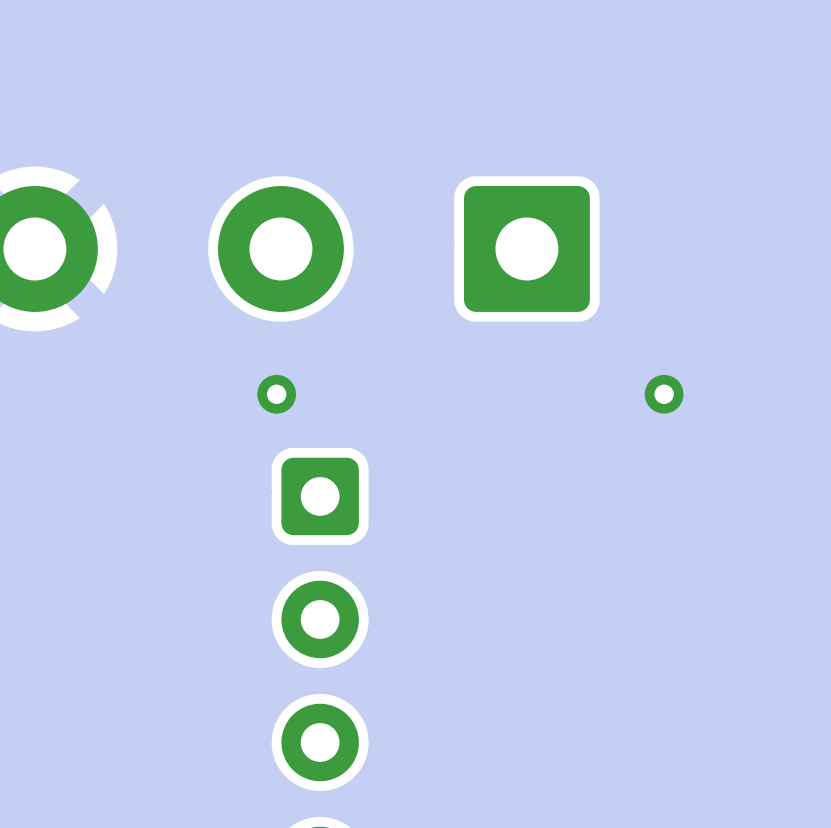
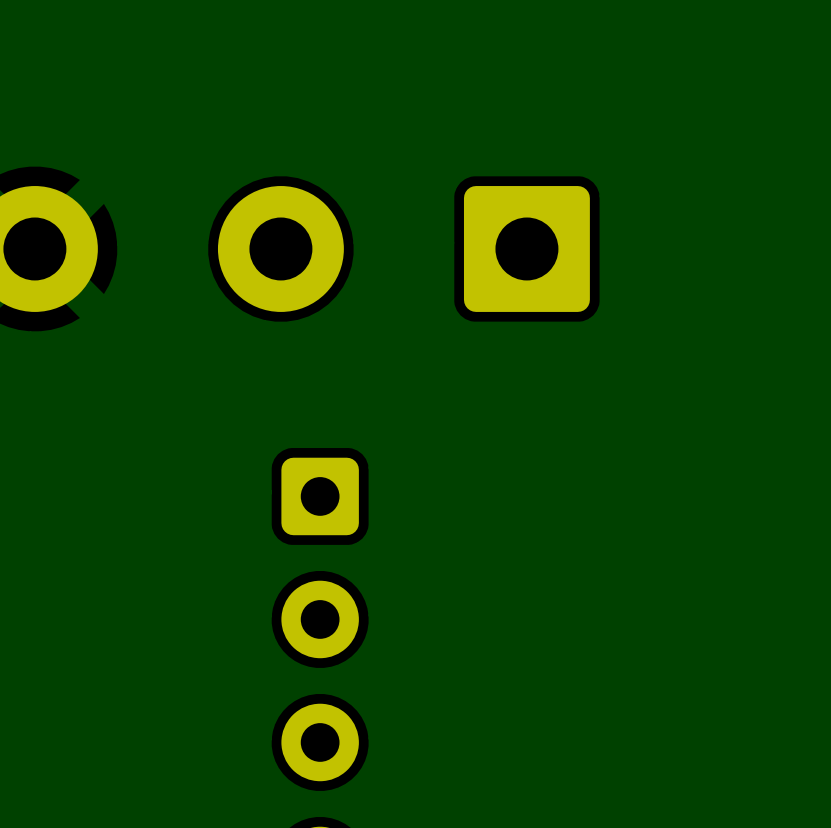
via: (276, 394) -> none
via: (664, 394) -> none

